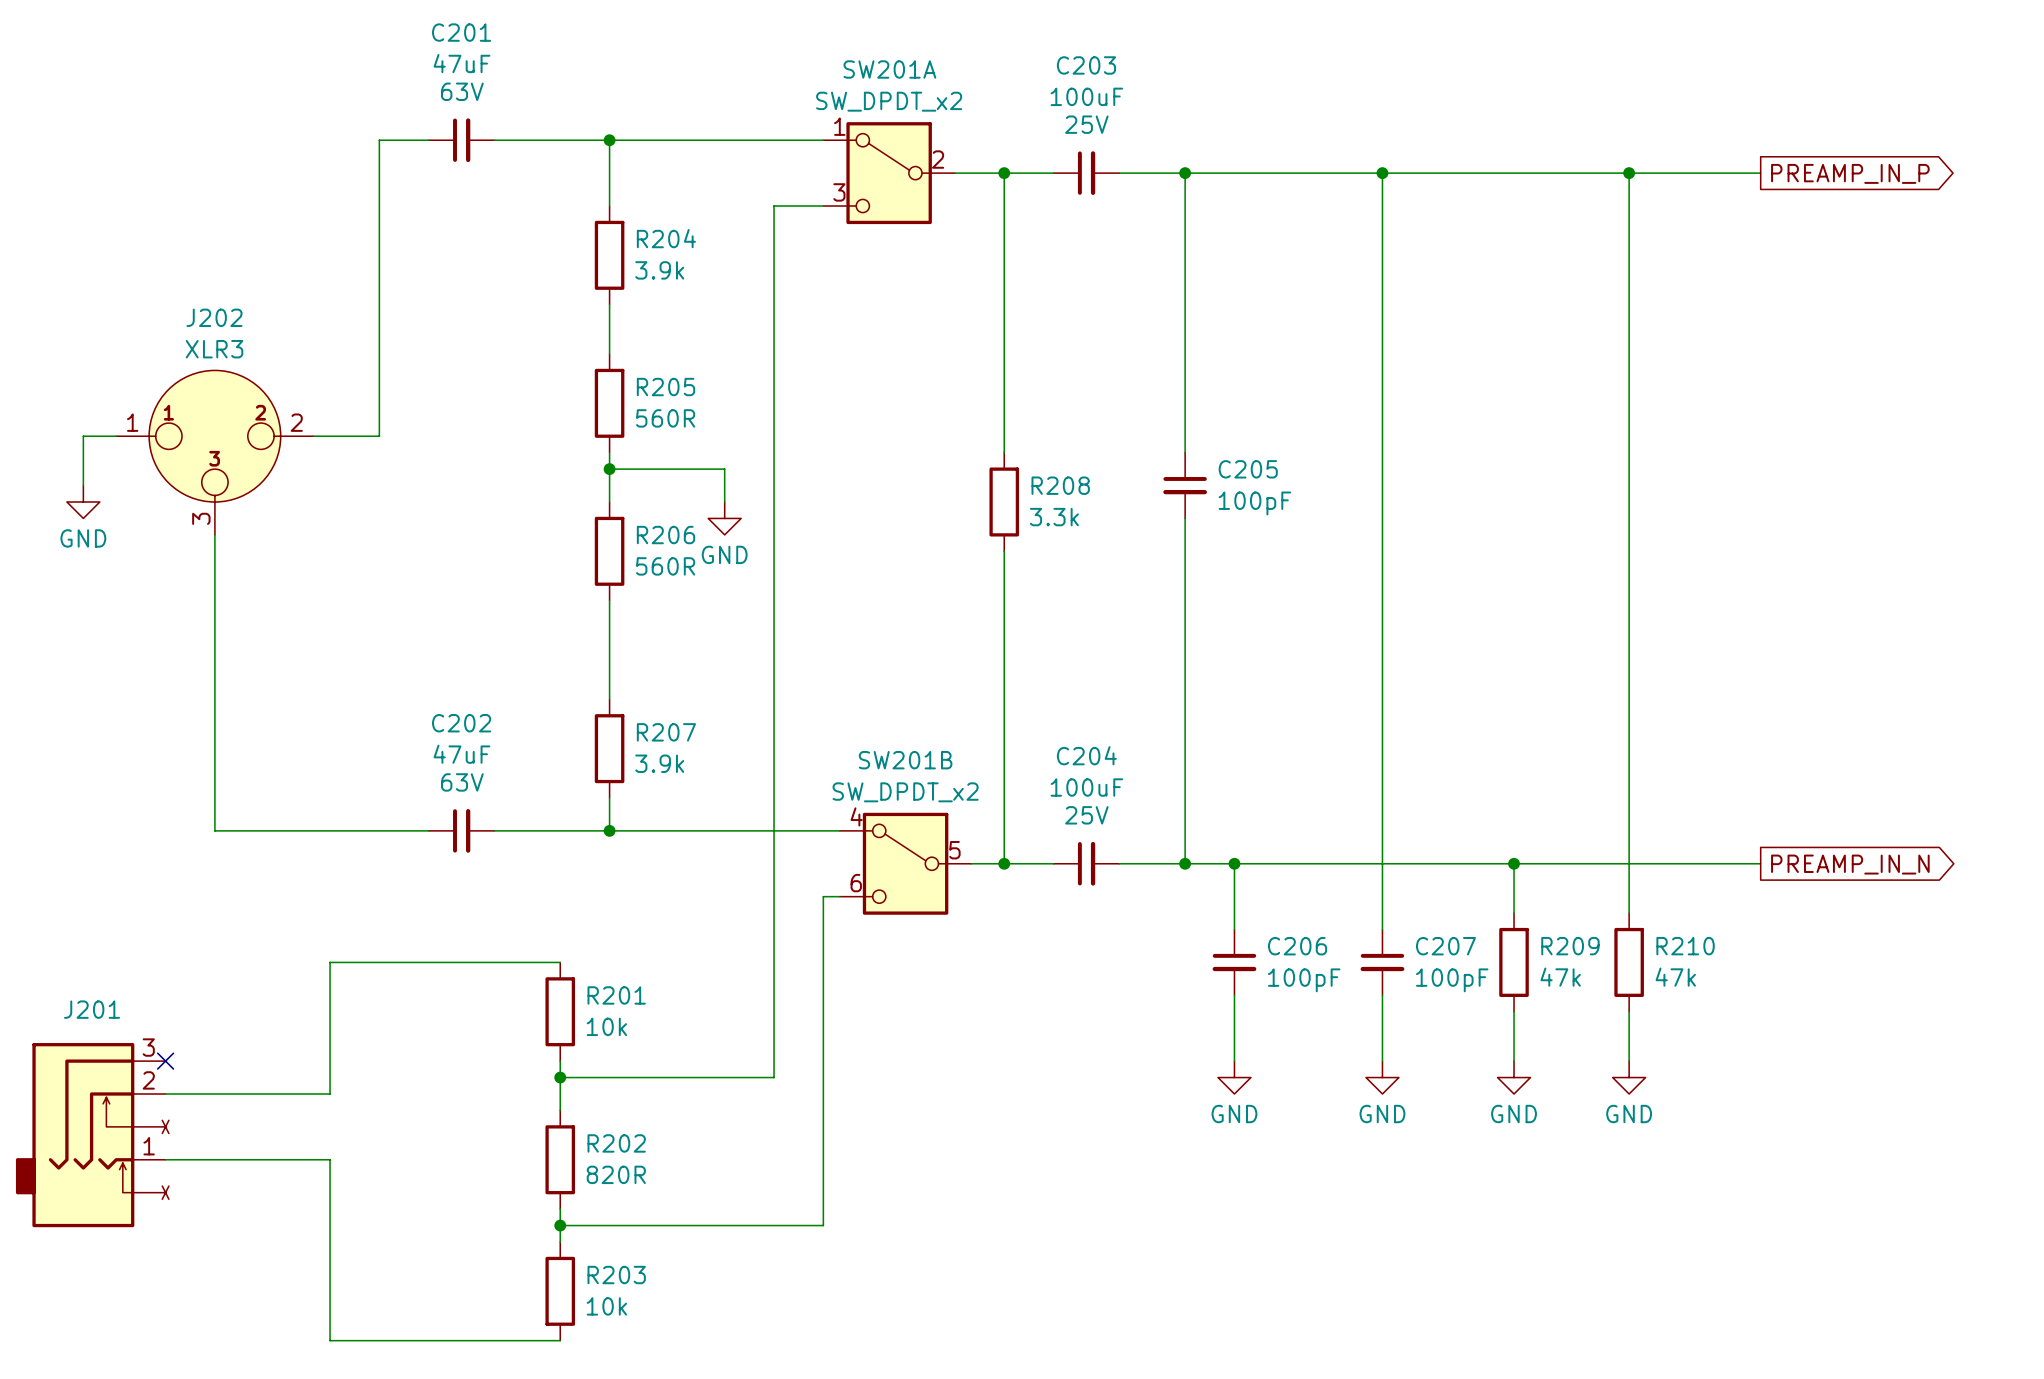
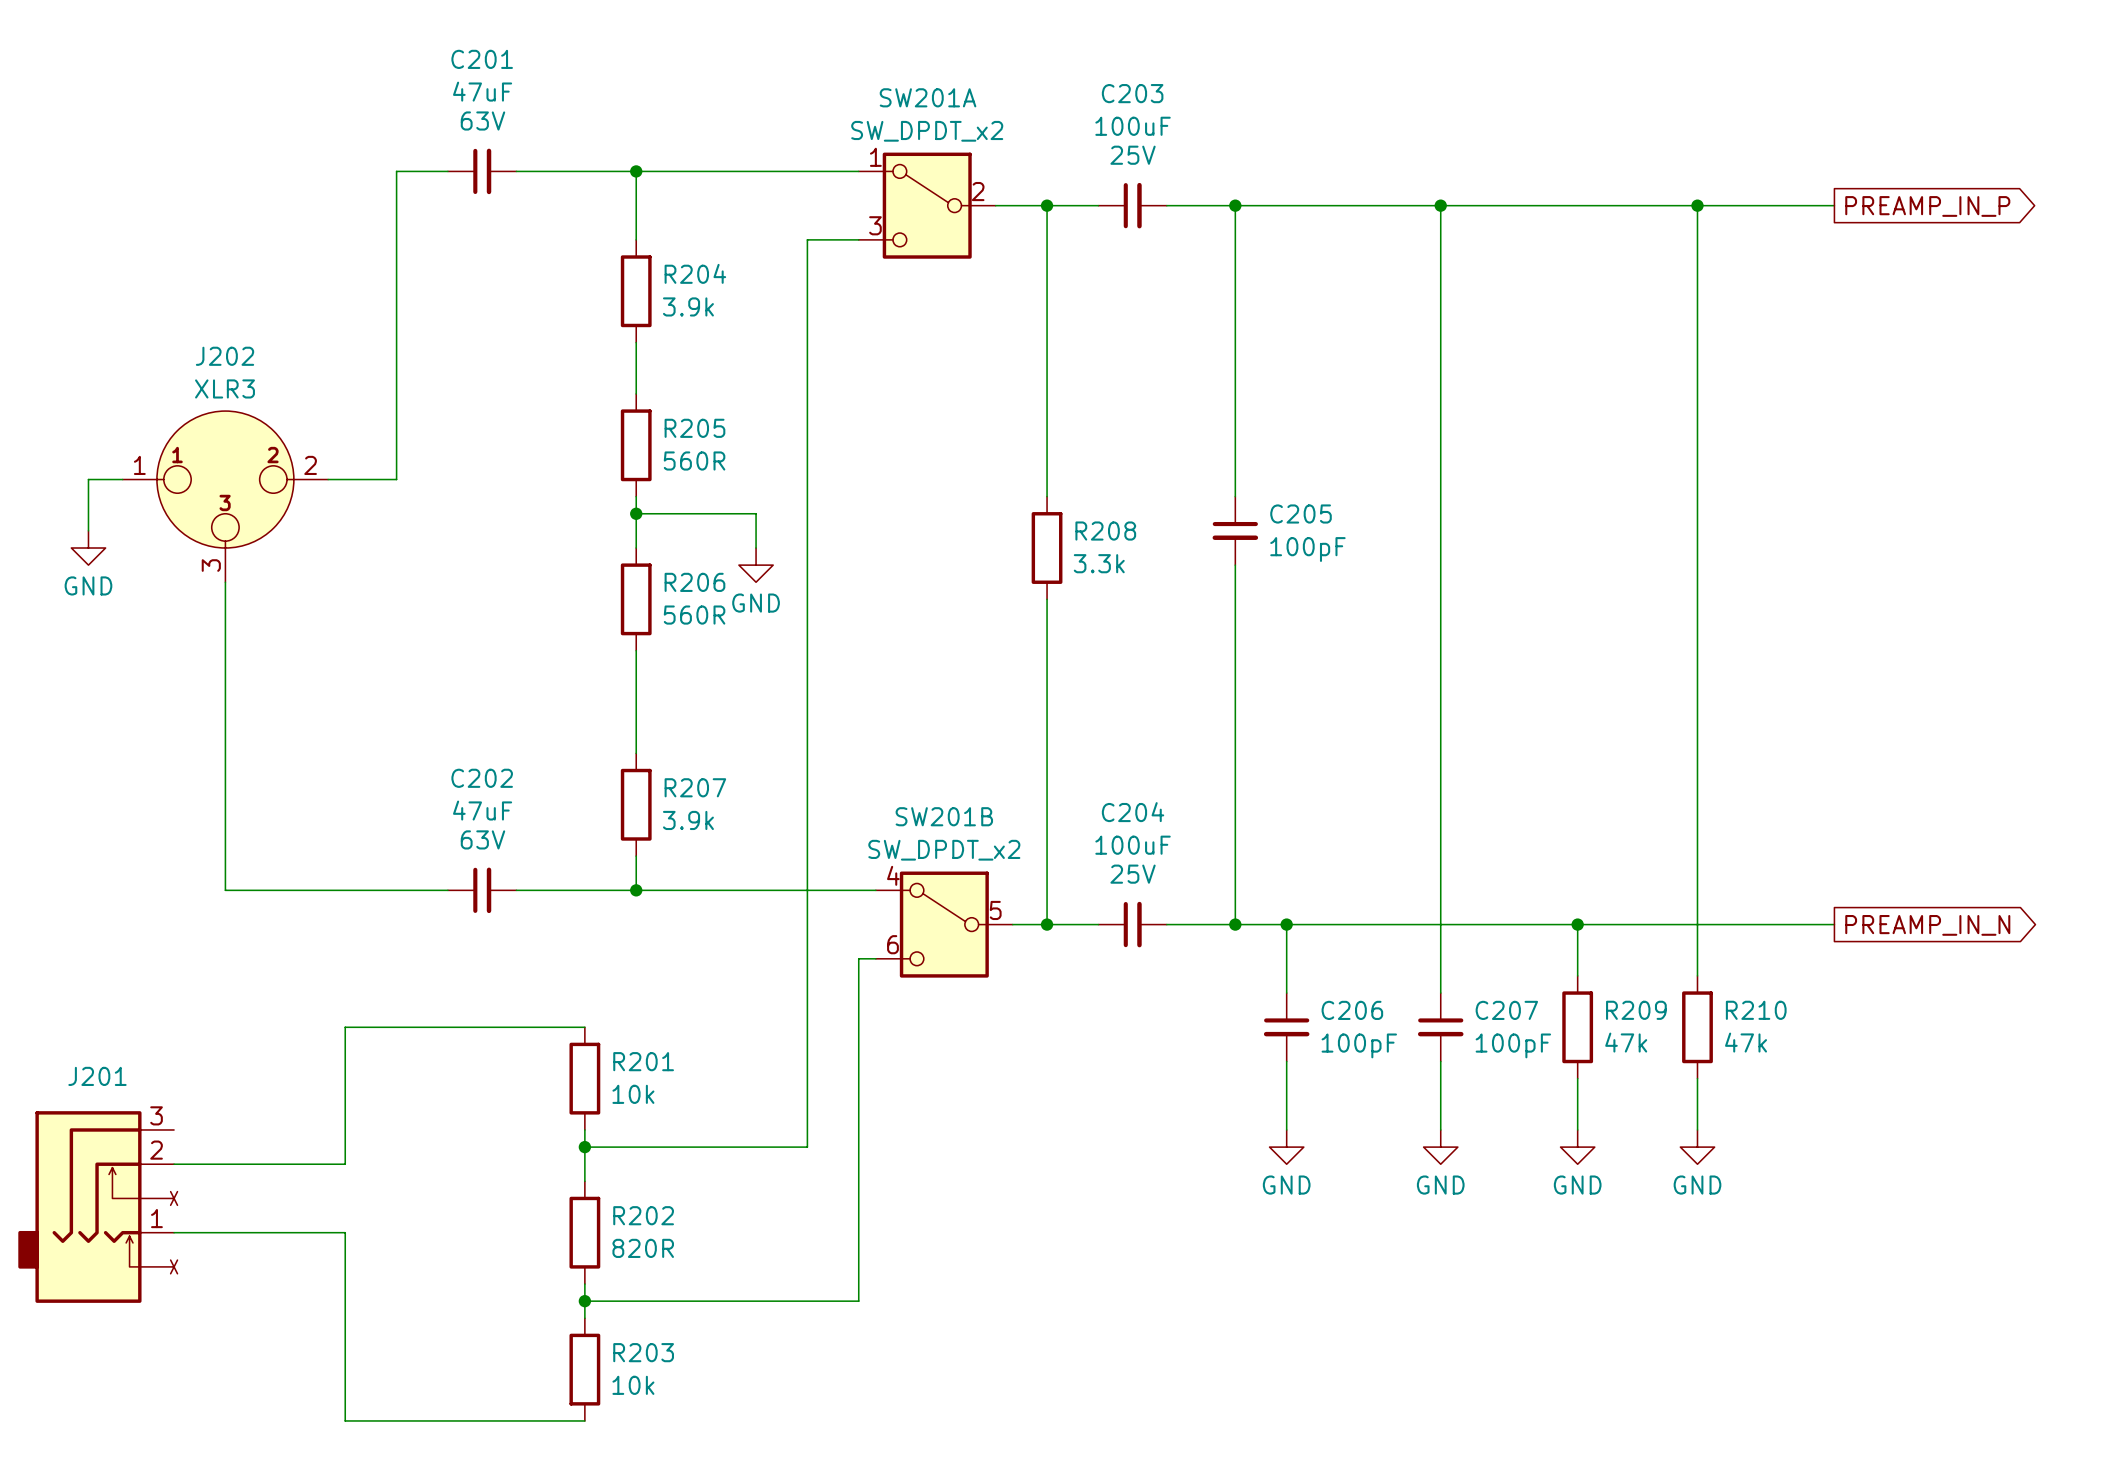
no-connect mark: (165, 1061) -> none

